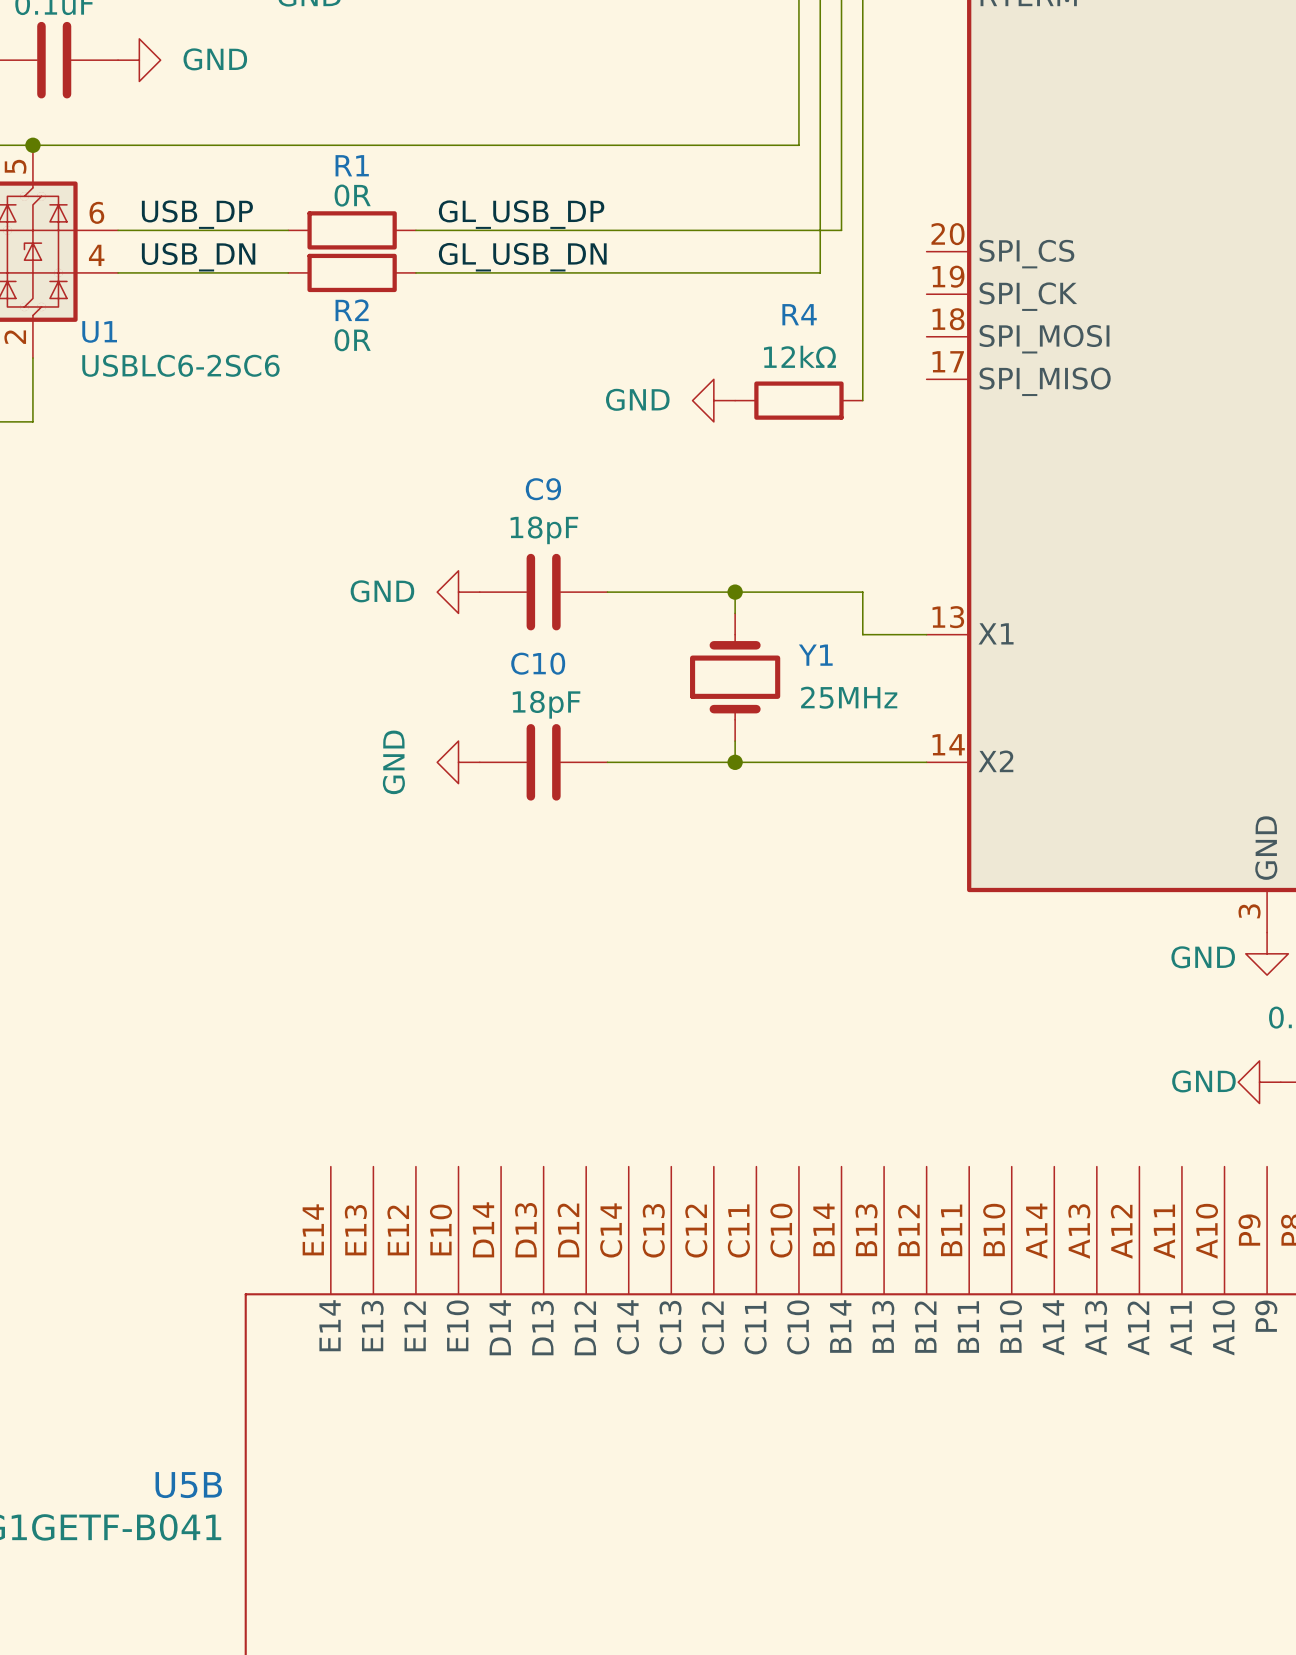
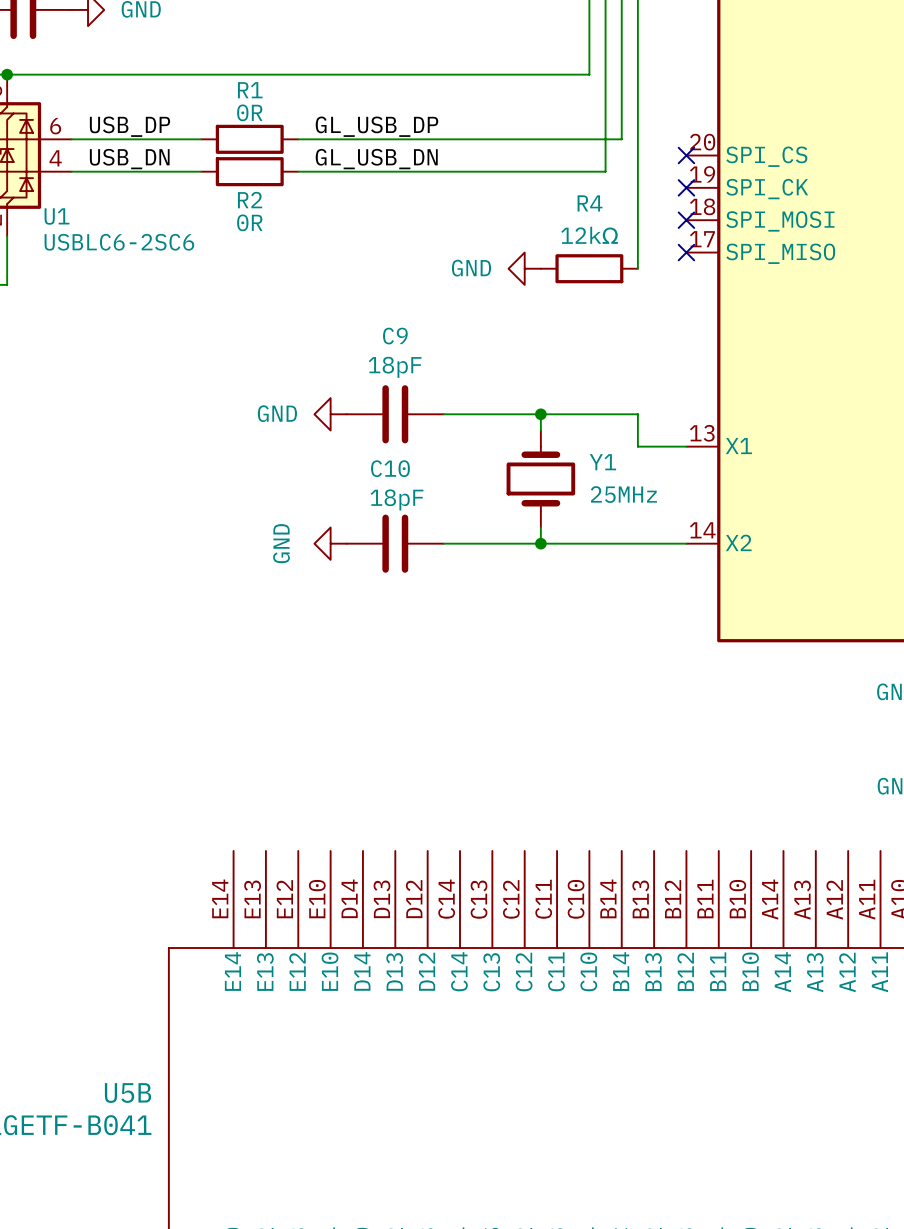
no-connect mark: none -> (686, 155)
no-connect mark: none -> (686, 187)
no-connect mark: none -> (686, 220)
no-connect mark: none -> (686, 252)

